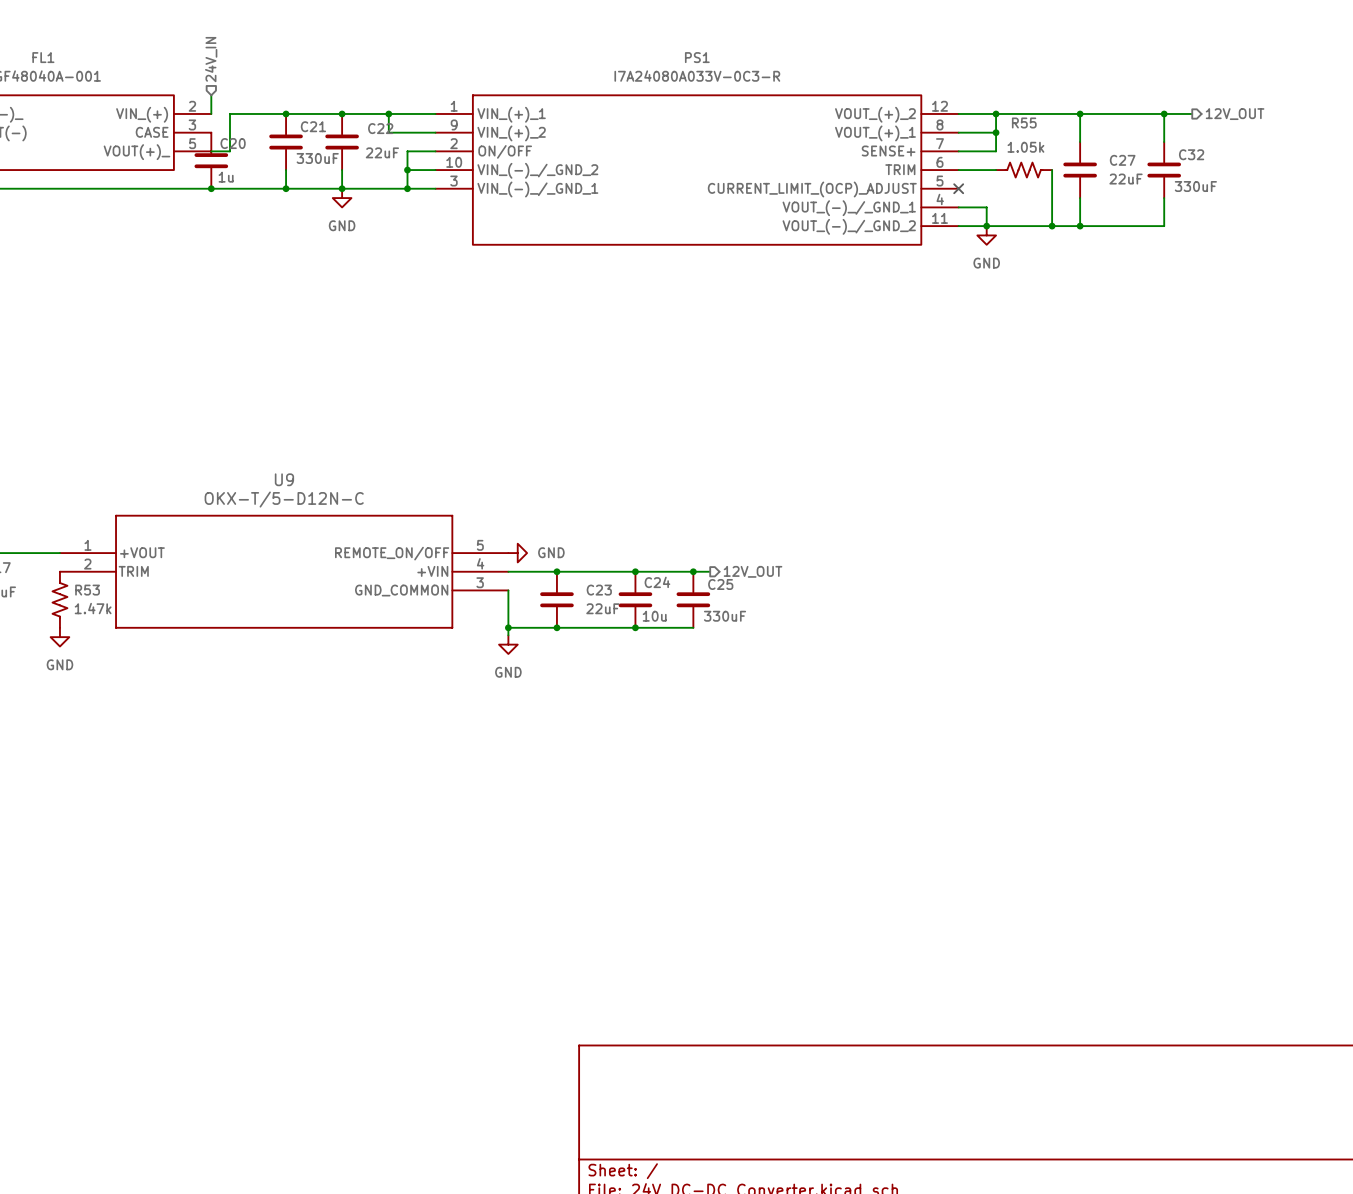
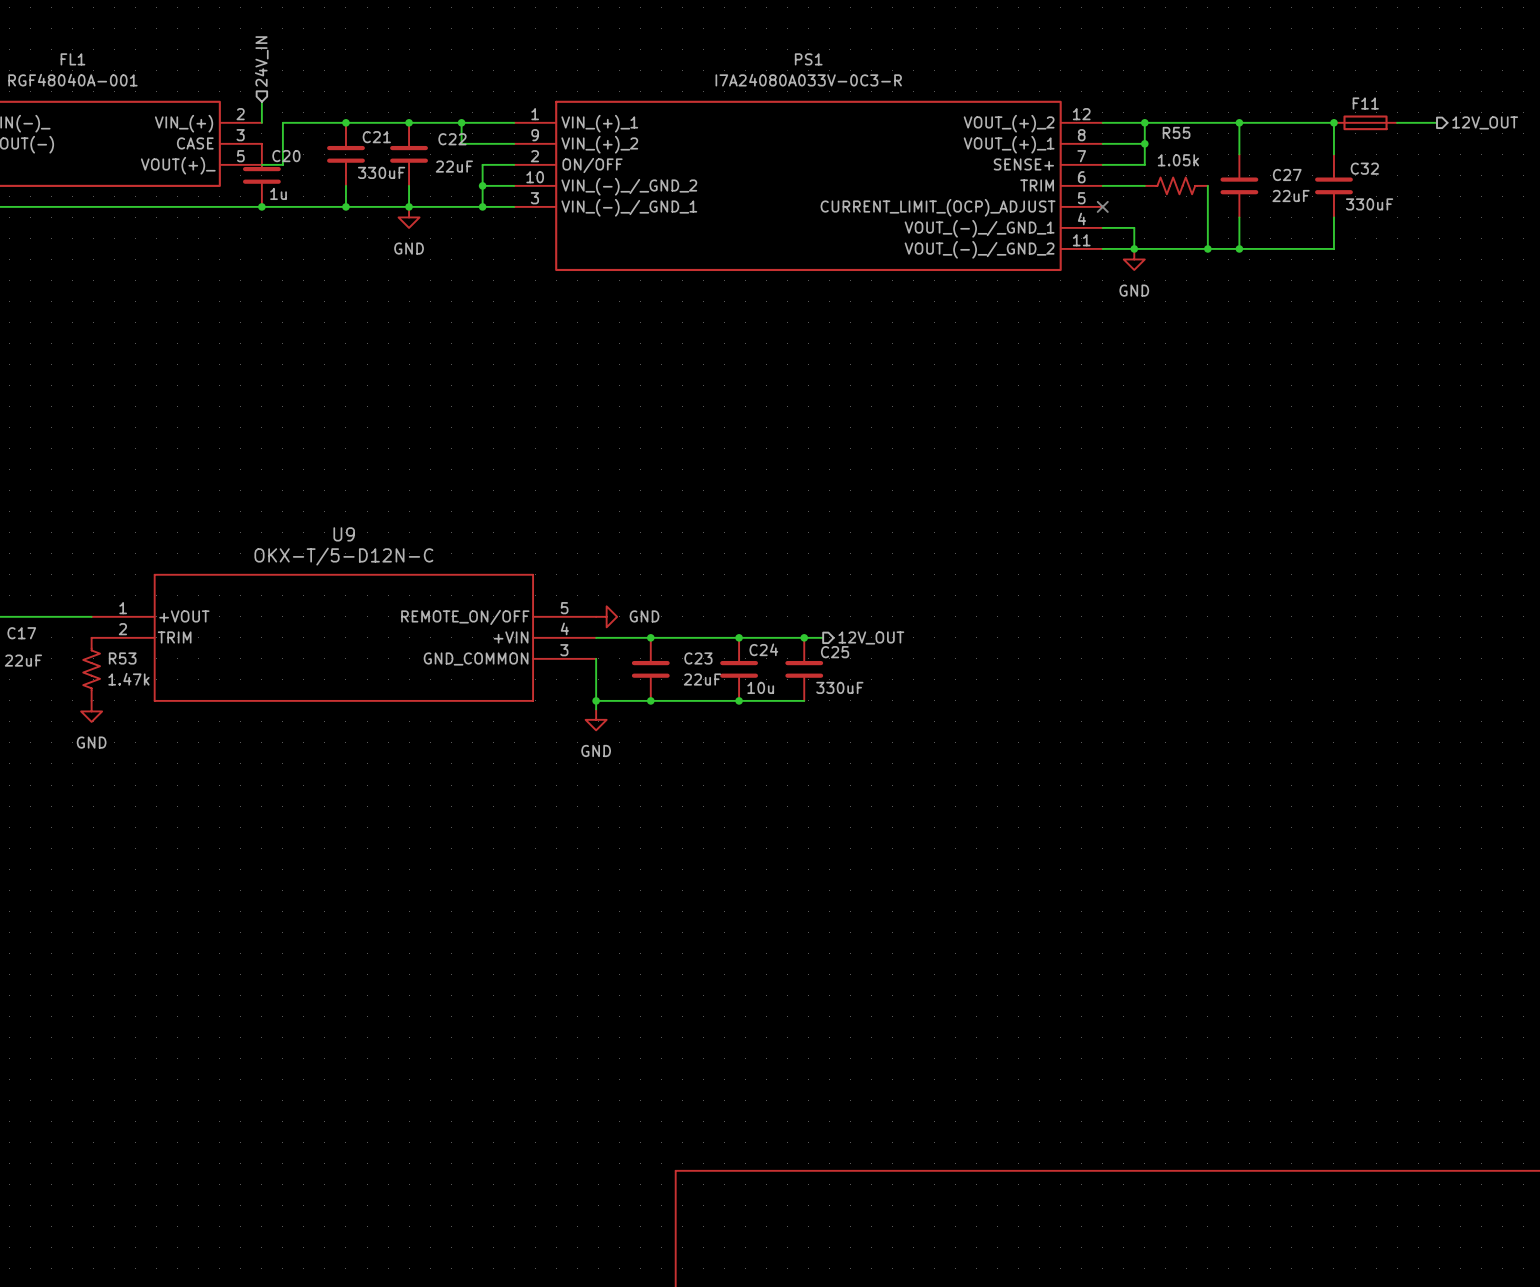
F11: none -> (1365, 122)
wire: none -> (1397, 122) (1436, 122)
hierarchical label position: 12V_OUT (1235, 114) -> 12V_OUT (1485, 122)

